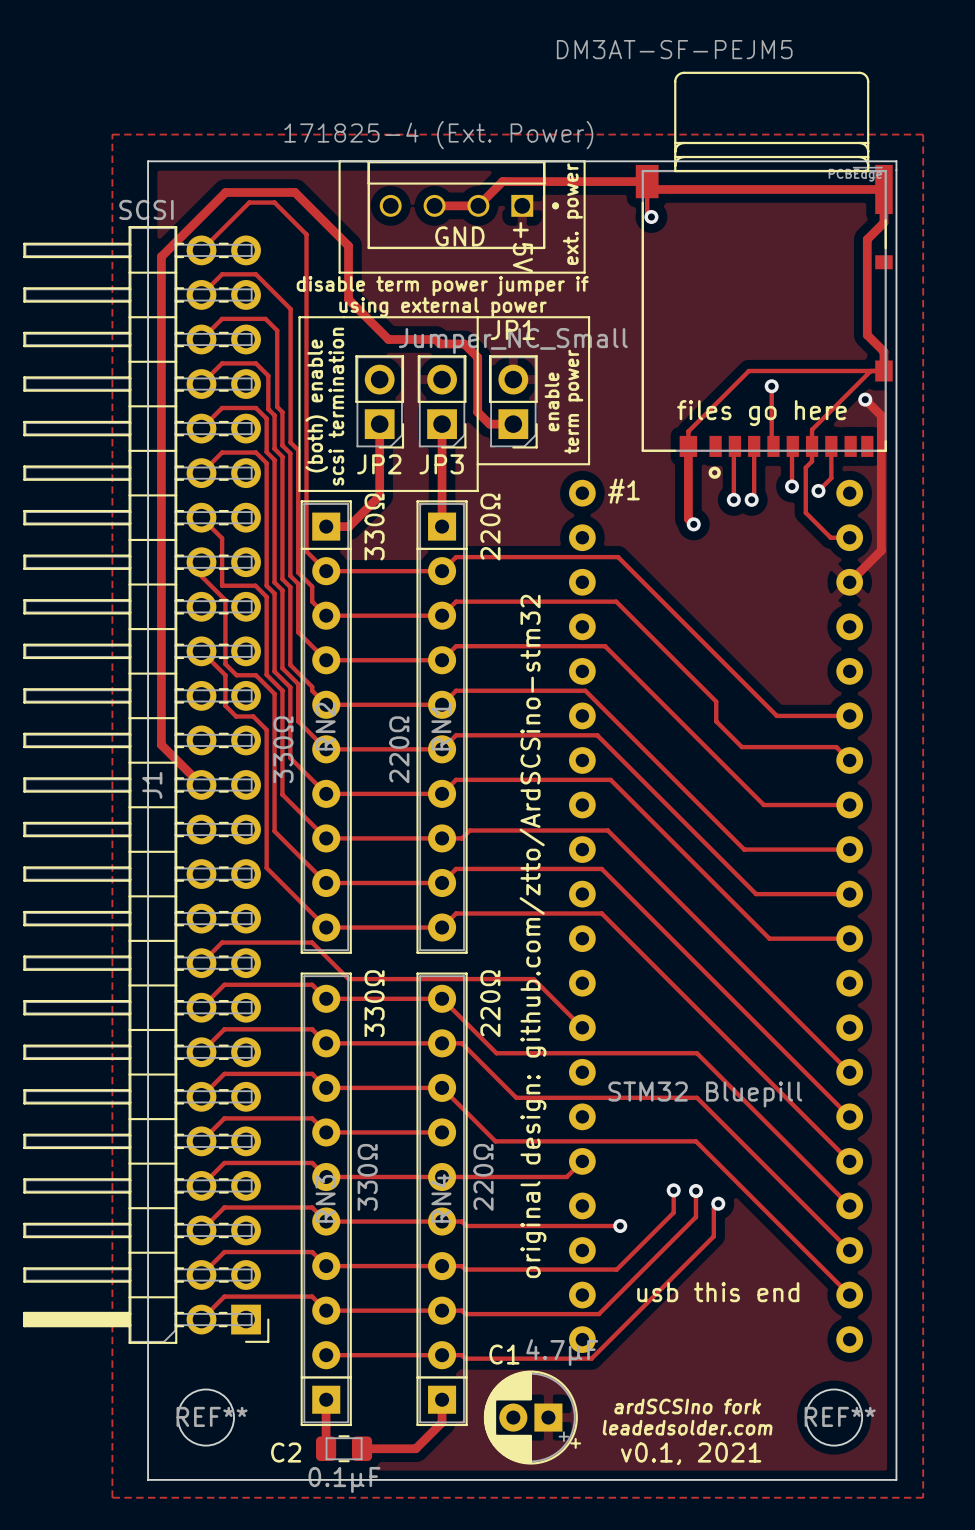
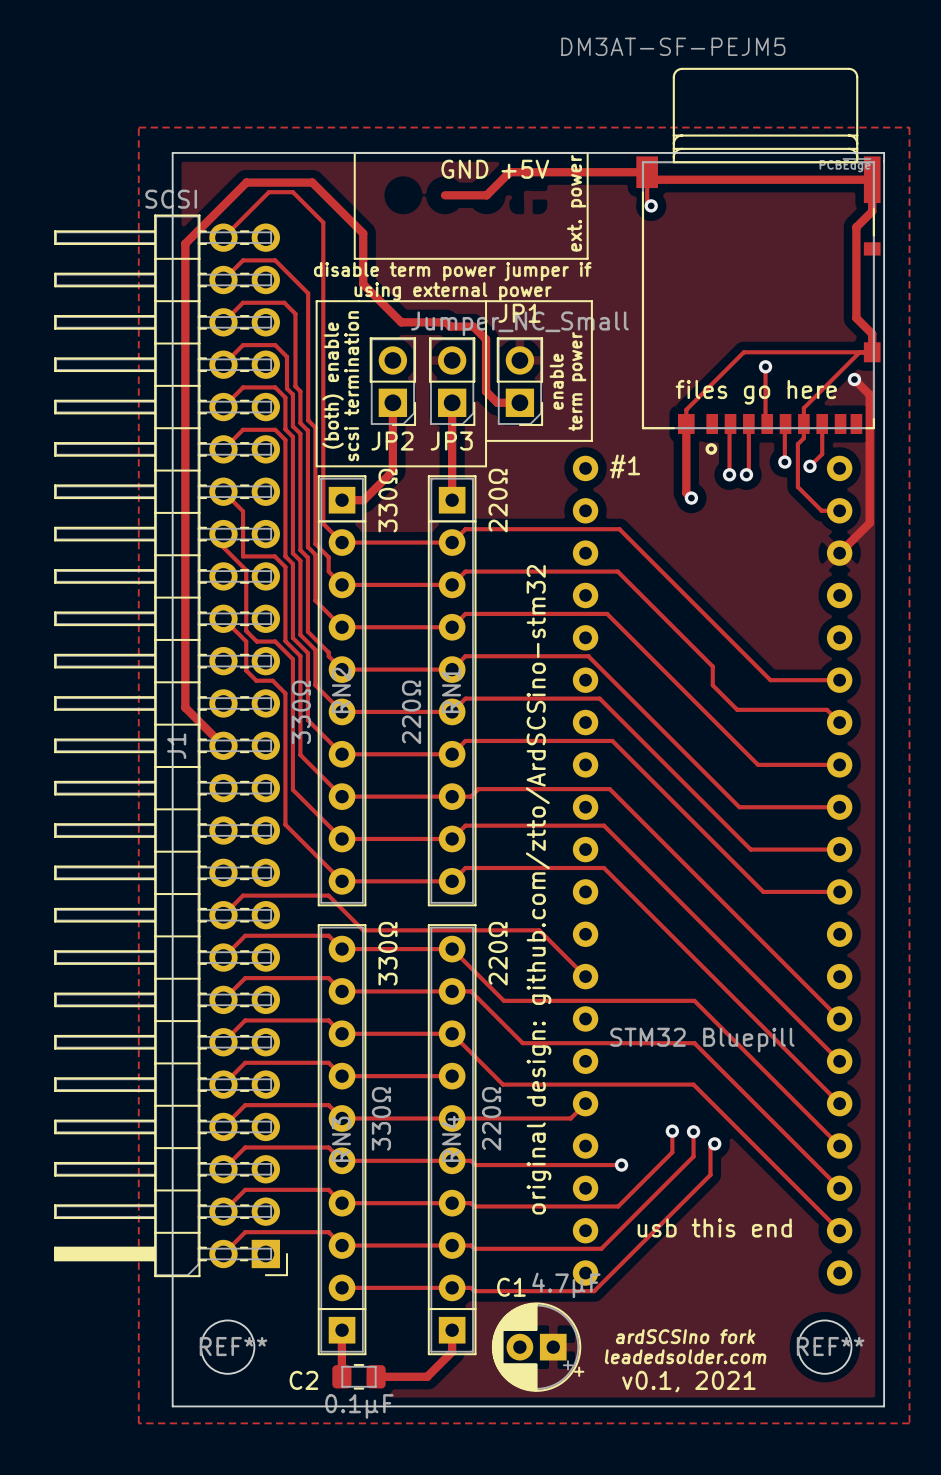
part: 171825-4 (Ext. Power) (463, 204) -> none
text position: GND (459, 236) -> GND (464, 169)
text rotation: 0° (522, 247) -> 90° counterclockwise (525, 169)
text position: +5V (522, 247) -> +5V (525, 169)

